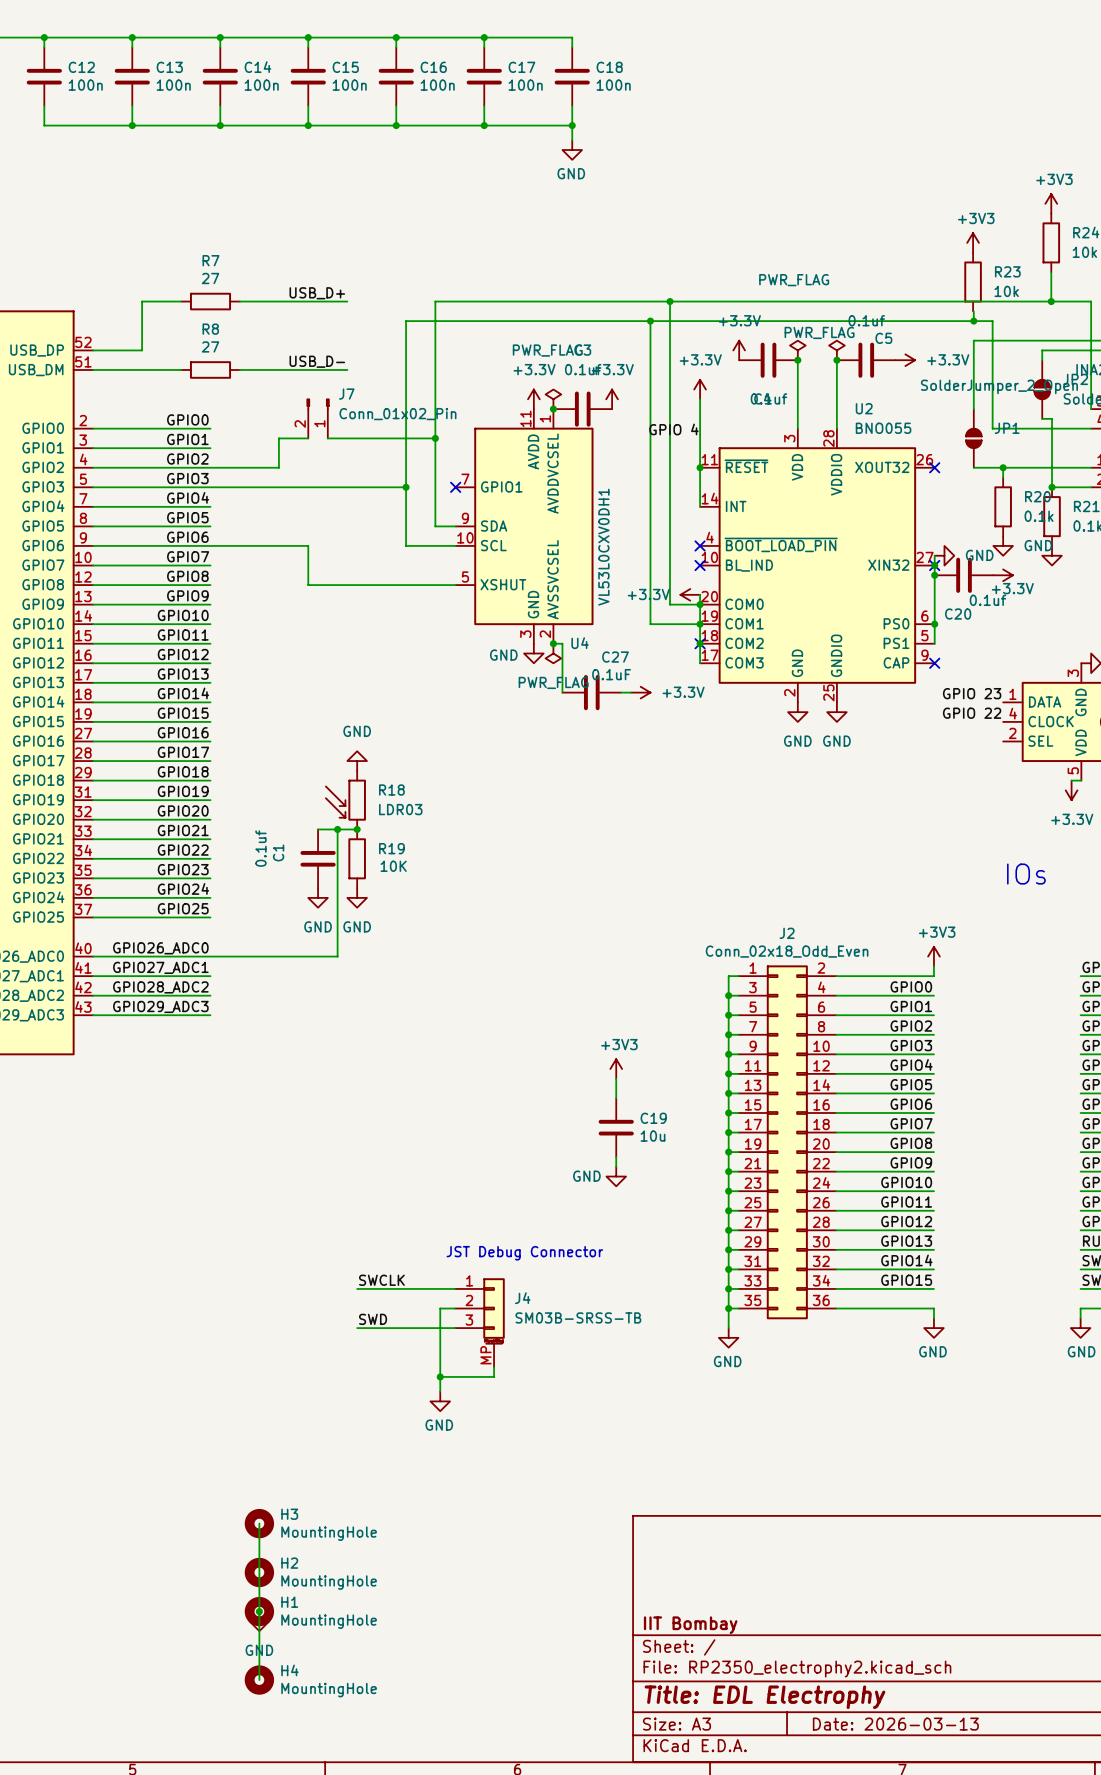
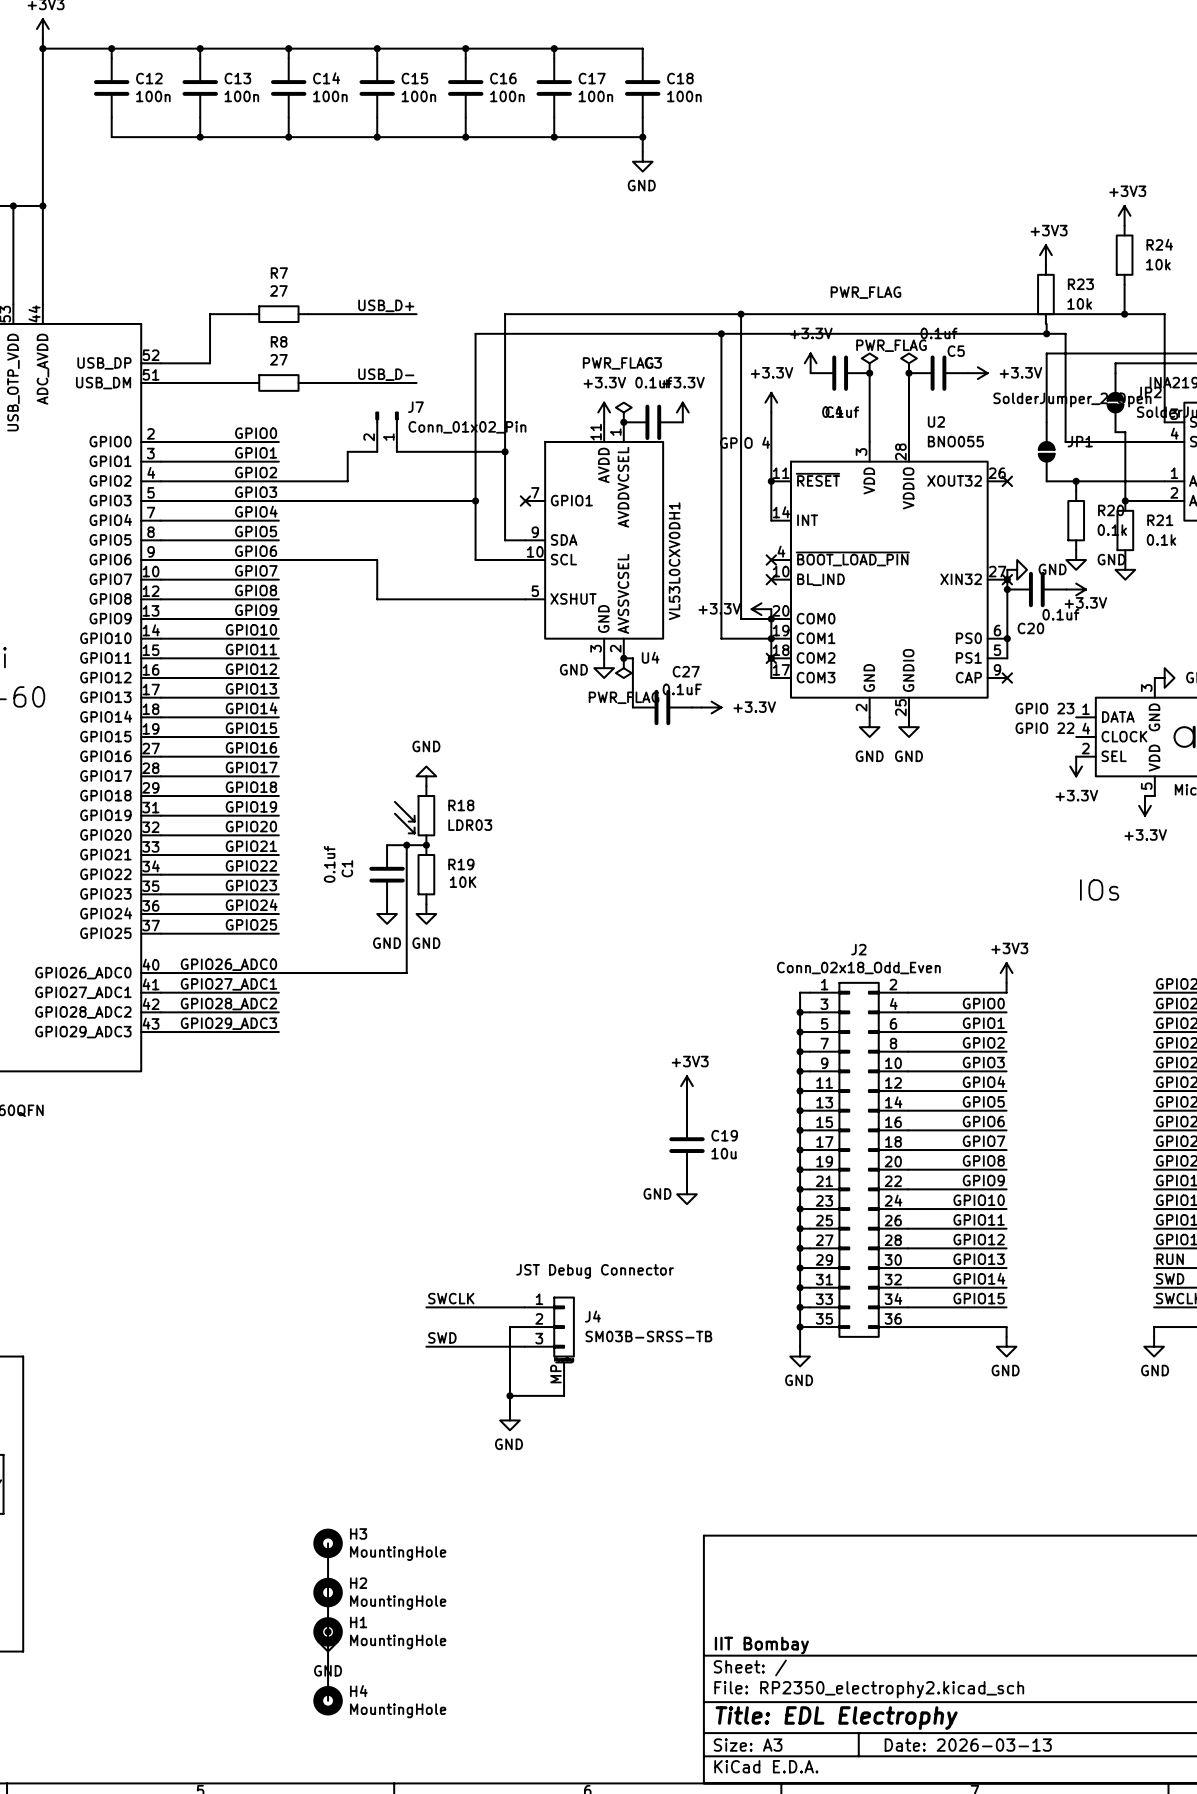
power symbol: none -> +3.3V (1076, 766)

